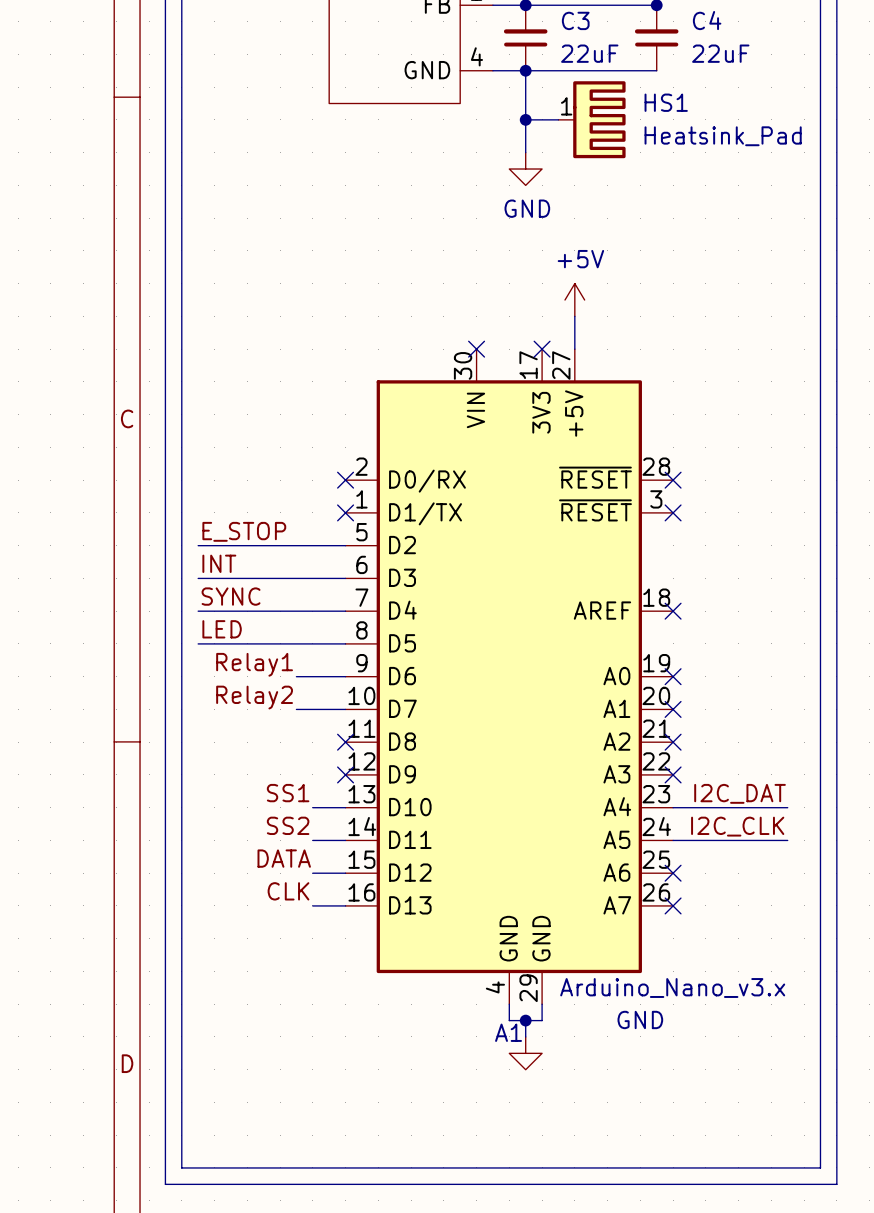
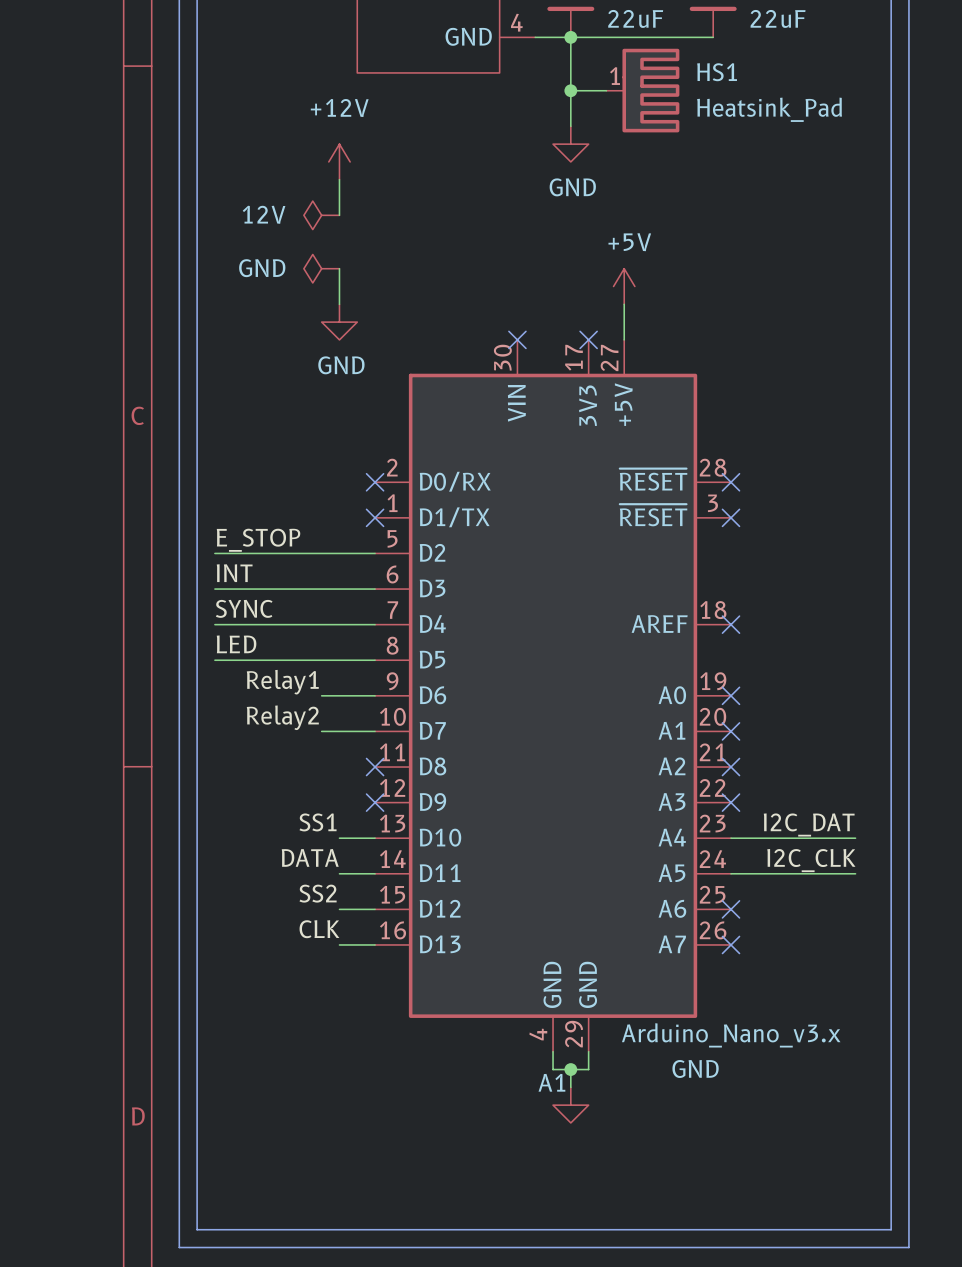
power symbol: none -> +12V (339, 161)
wire: none -> (339, 179) (339, 215)
power symbol: none -> 12V (321, 215)
power symbol: none -> GND (321, 268)
wire: none -> (339, 268) (339, 304)
power symbol: none -> GND (339, 322)
label: SS2 (288, 825) -> DATA (310, 857)
label: DATA (284, 858) -> SS2 (318, 893)

